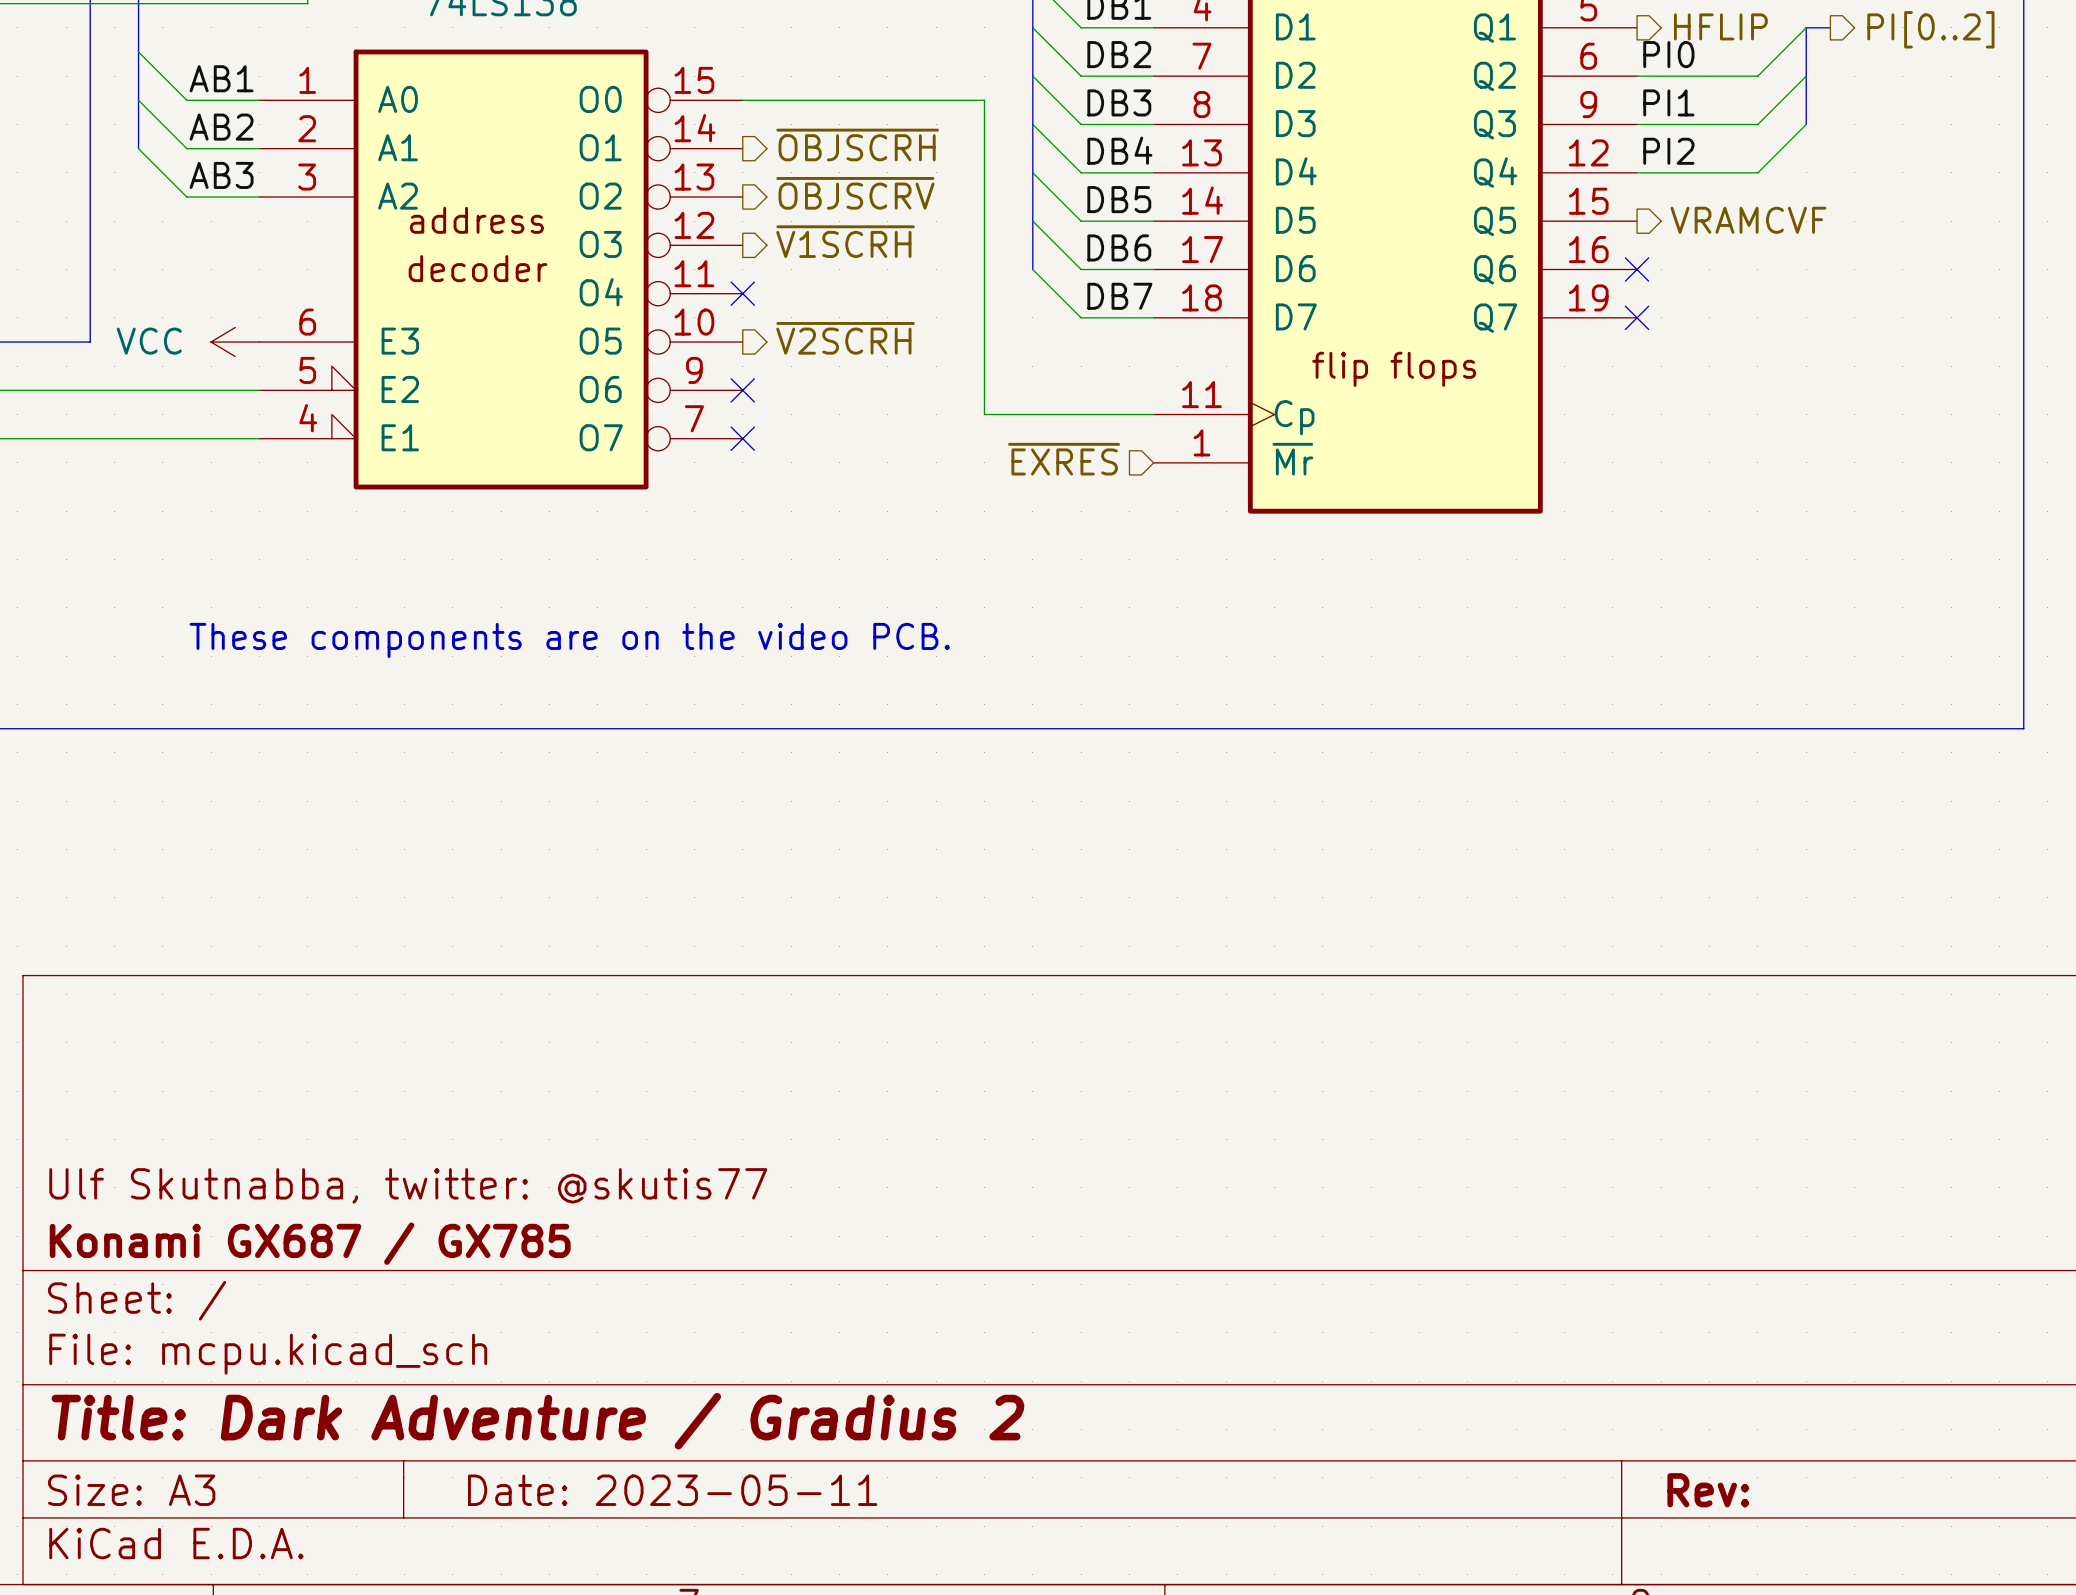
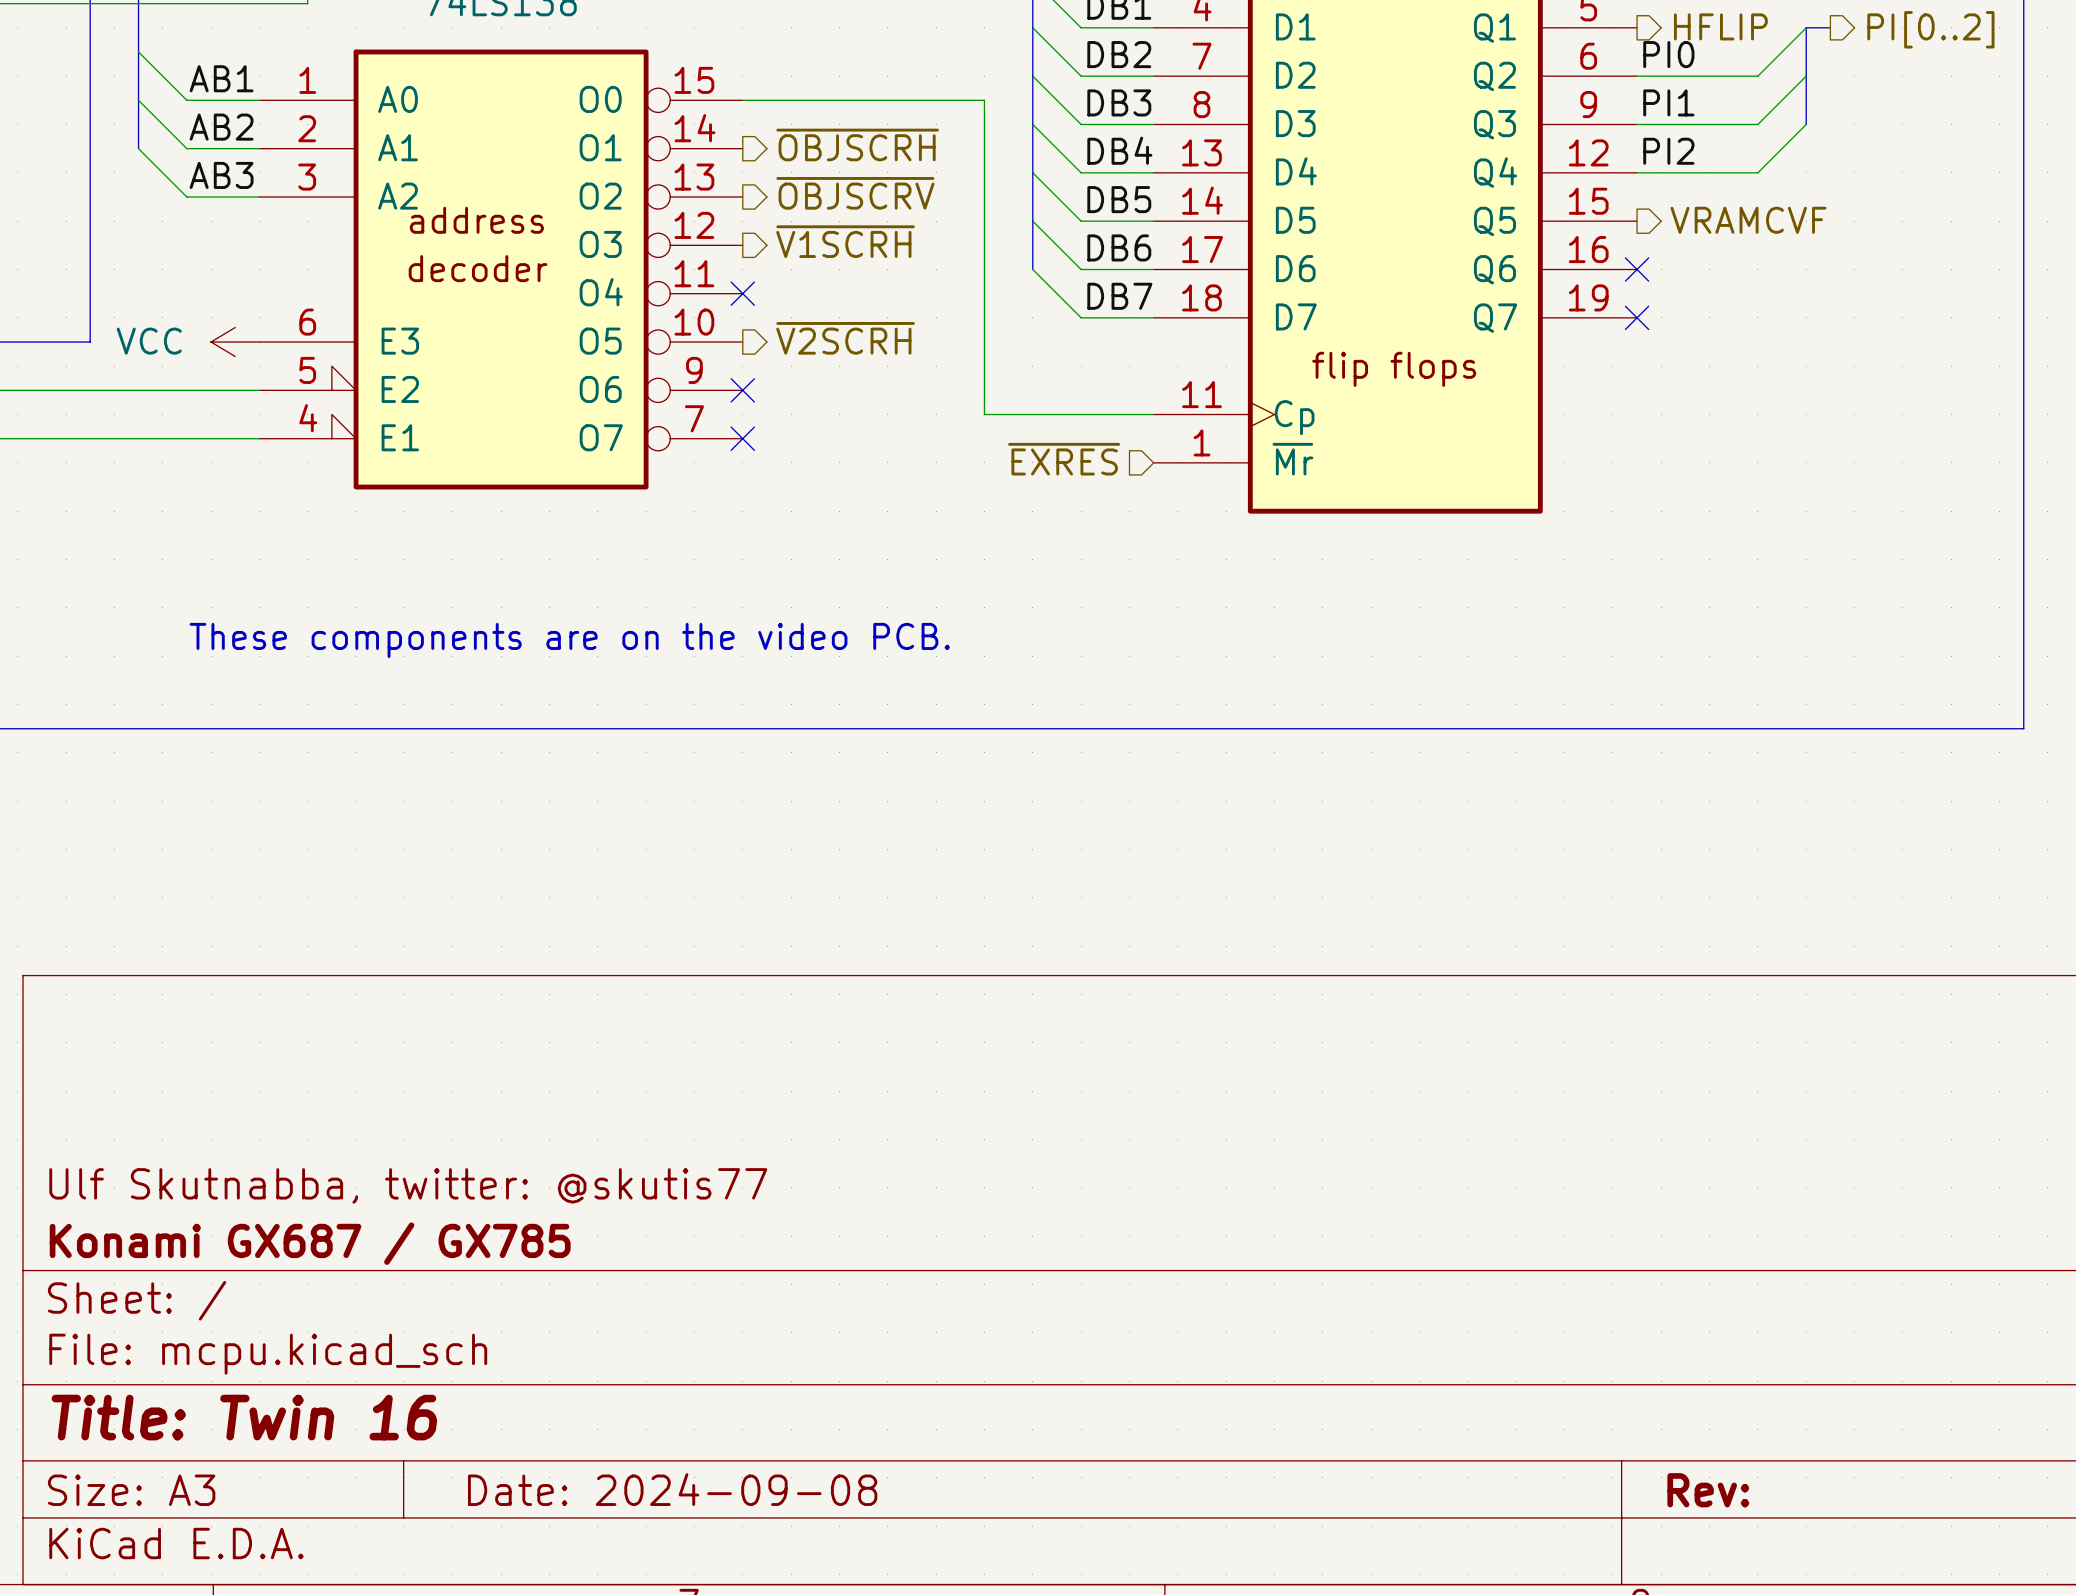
title block: Title: Dark Adventure / Gradius 2 (538, 1421) -> Title: Twin 16 (244, 1417)
title block: Date: 2023-05-11 (672, 1490) -> Date: 2024-09-08 (672, 1489)

